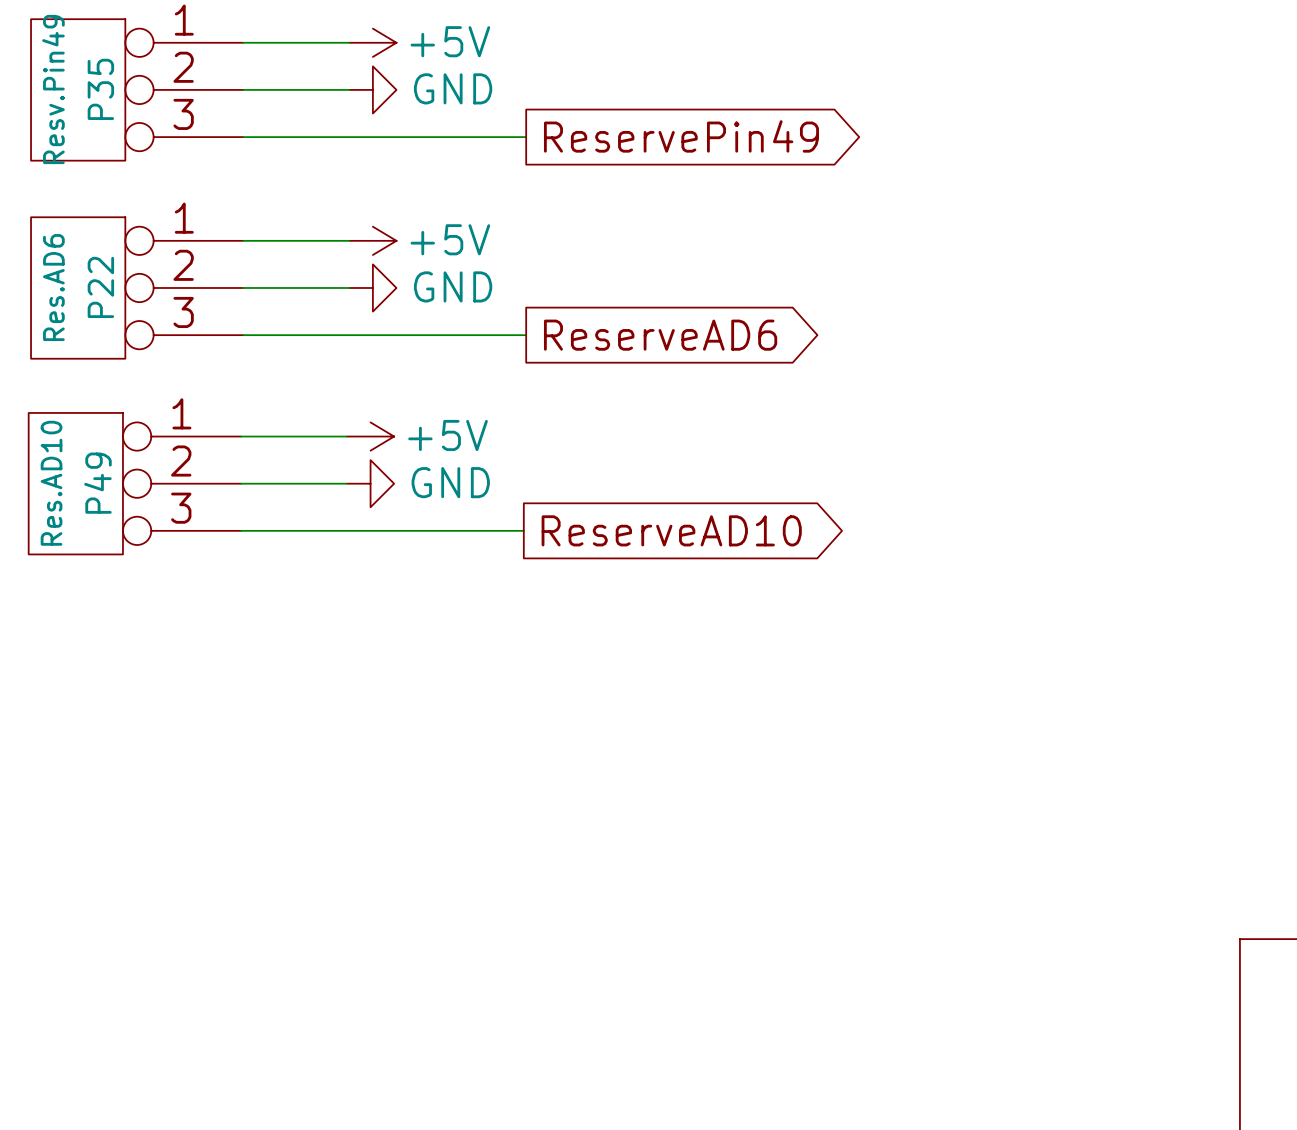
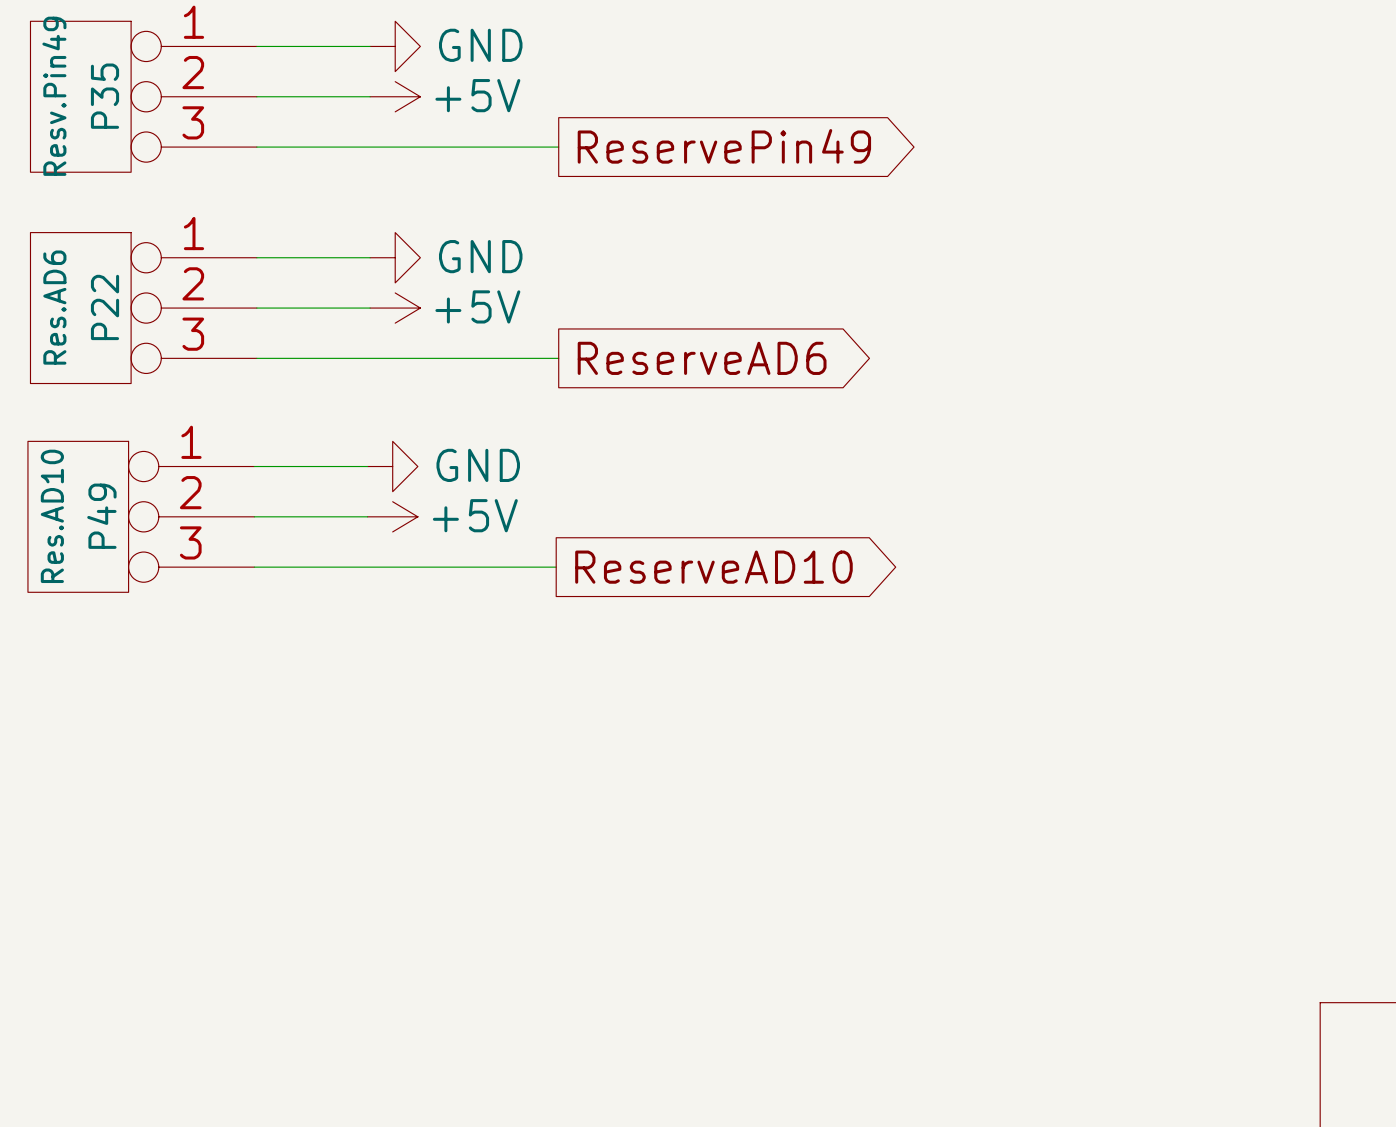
power symbol: +5V (372, 42) -> GND (395, 46)
power symbol: GND (372, 89) -> +5V (395, 96)
power symbol: +5V (372, 240) -> GND (395, 257)
power symbol: GND (372, 287) -> +5V (395, 308)
power symbol: +5V (370, 436) -> GND (392, 466)
power symbol: GND (370, 483) -> +5V (392, 516)

